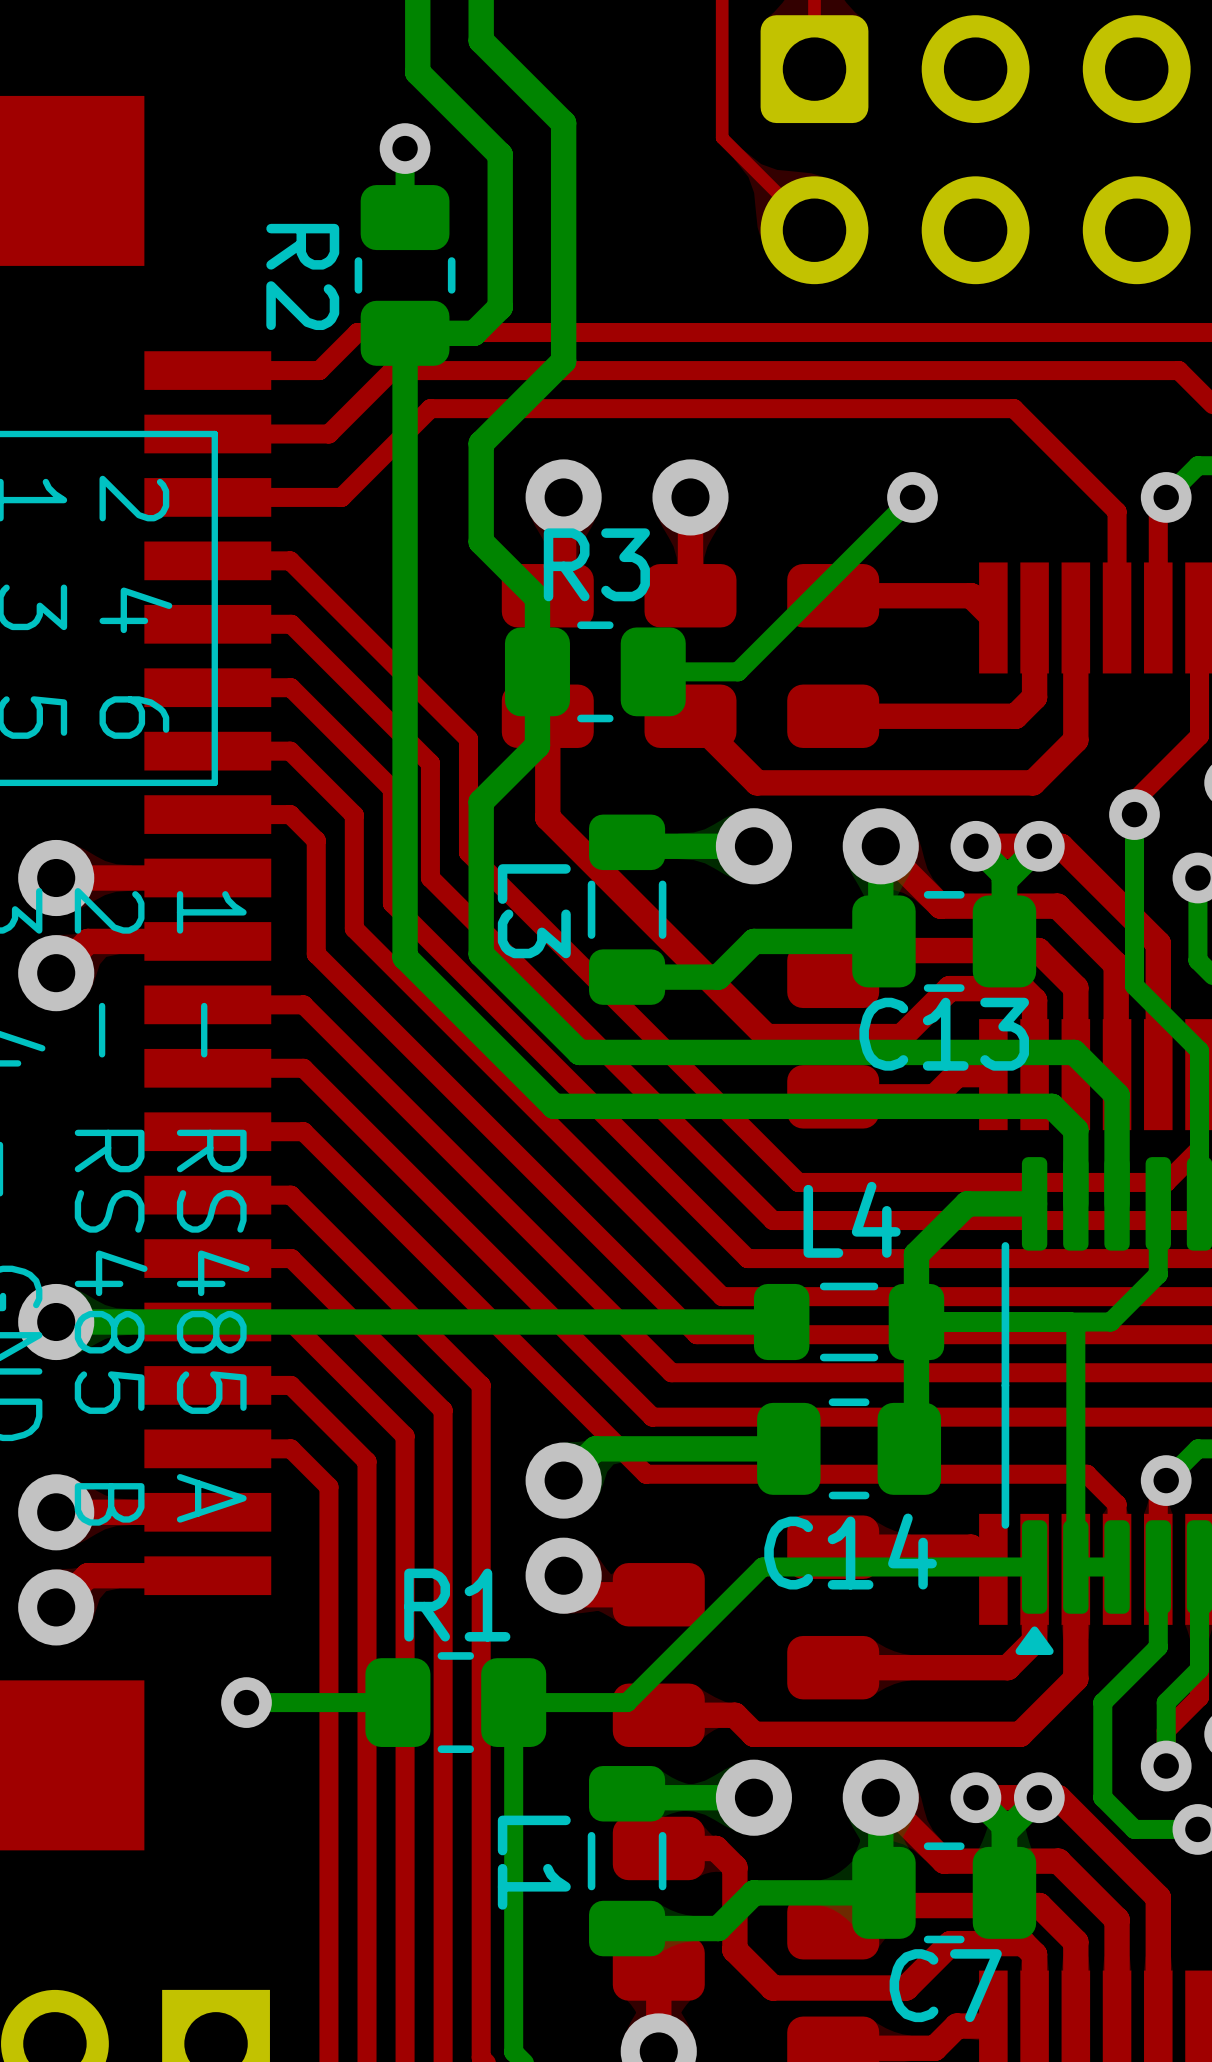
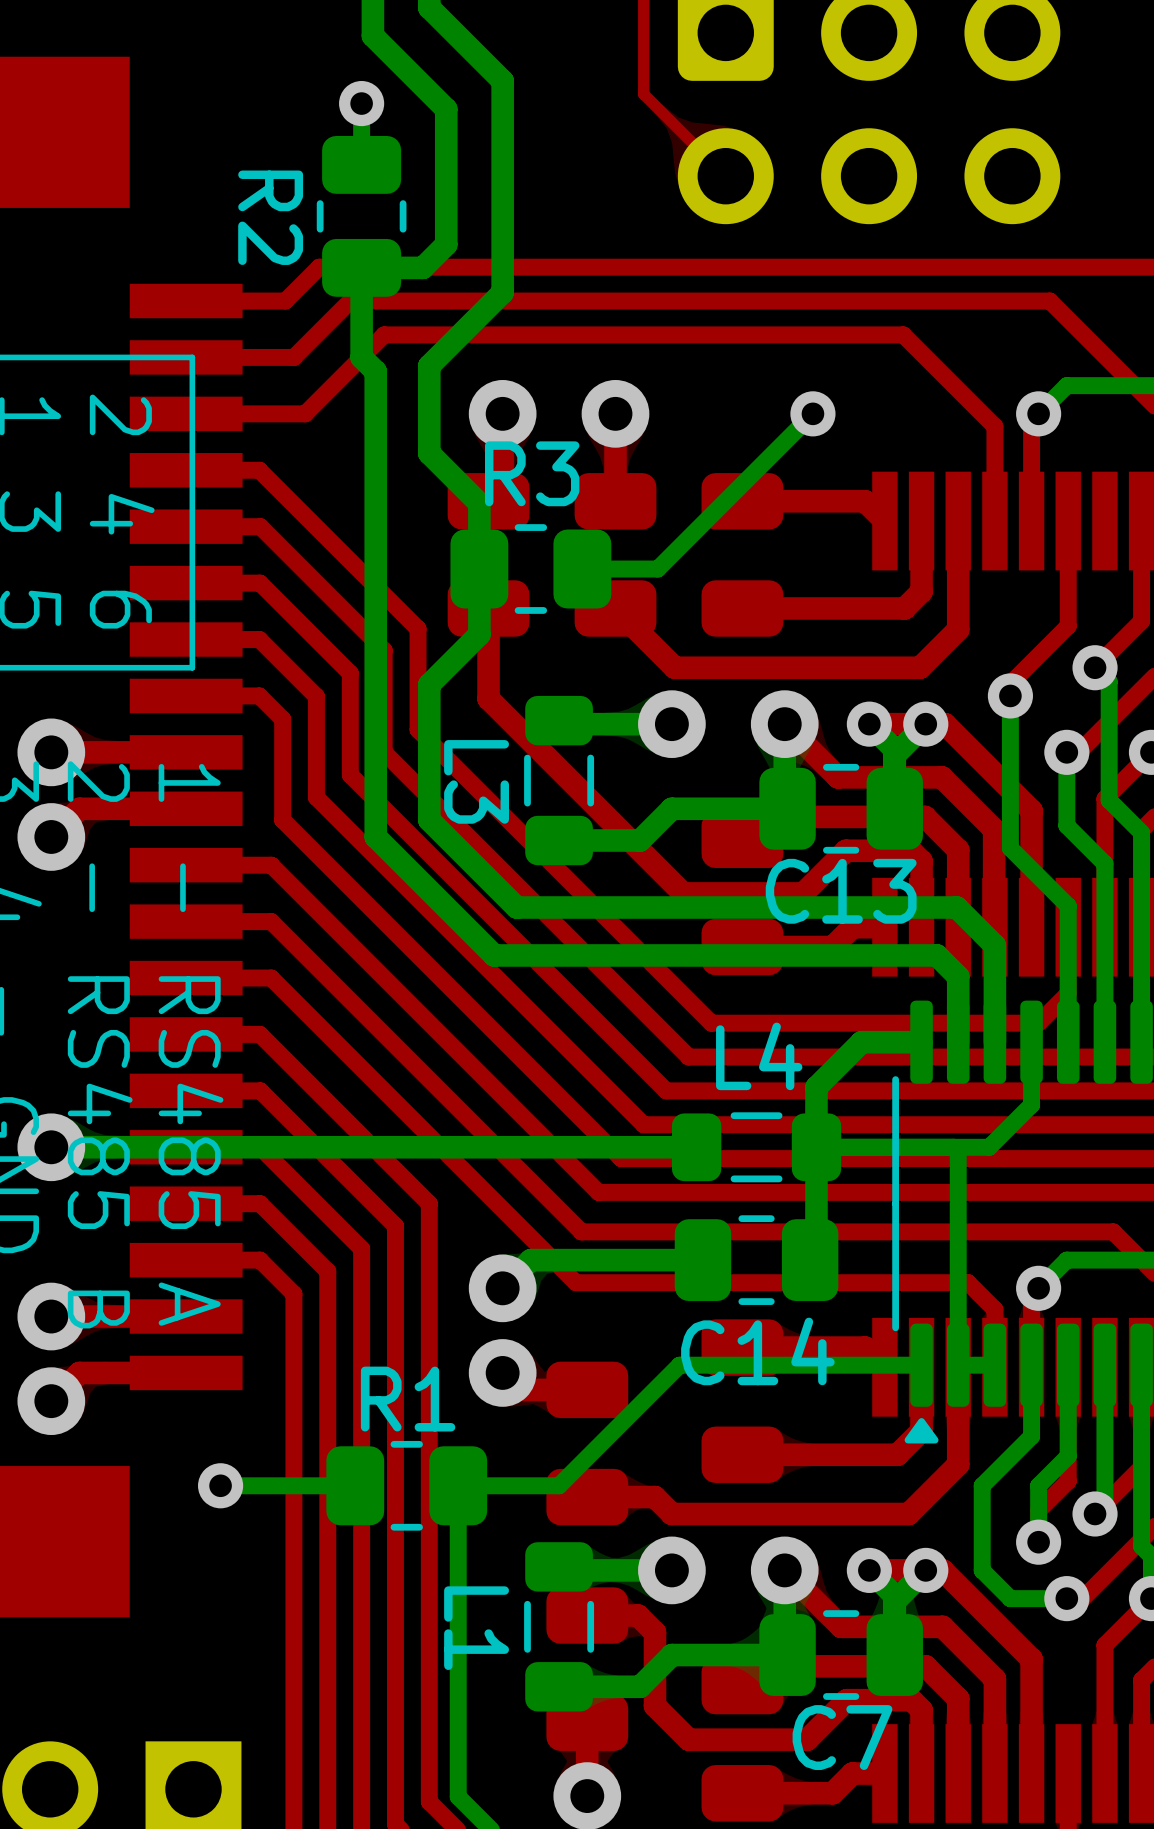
bottom track: (405, 434) (405, 957) (420, 973) -> (361, 357) (375, 371) (375, 836)

